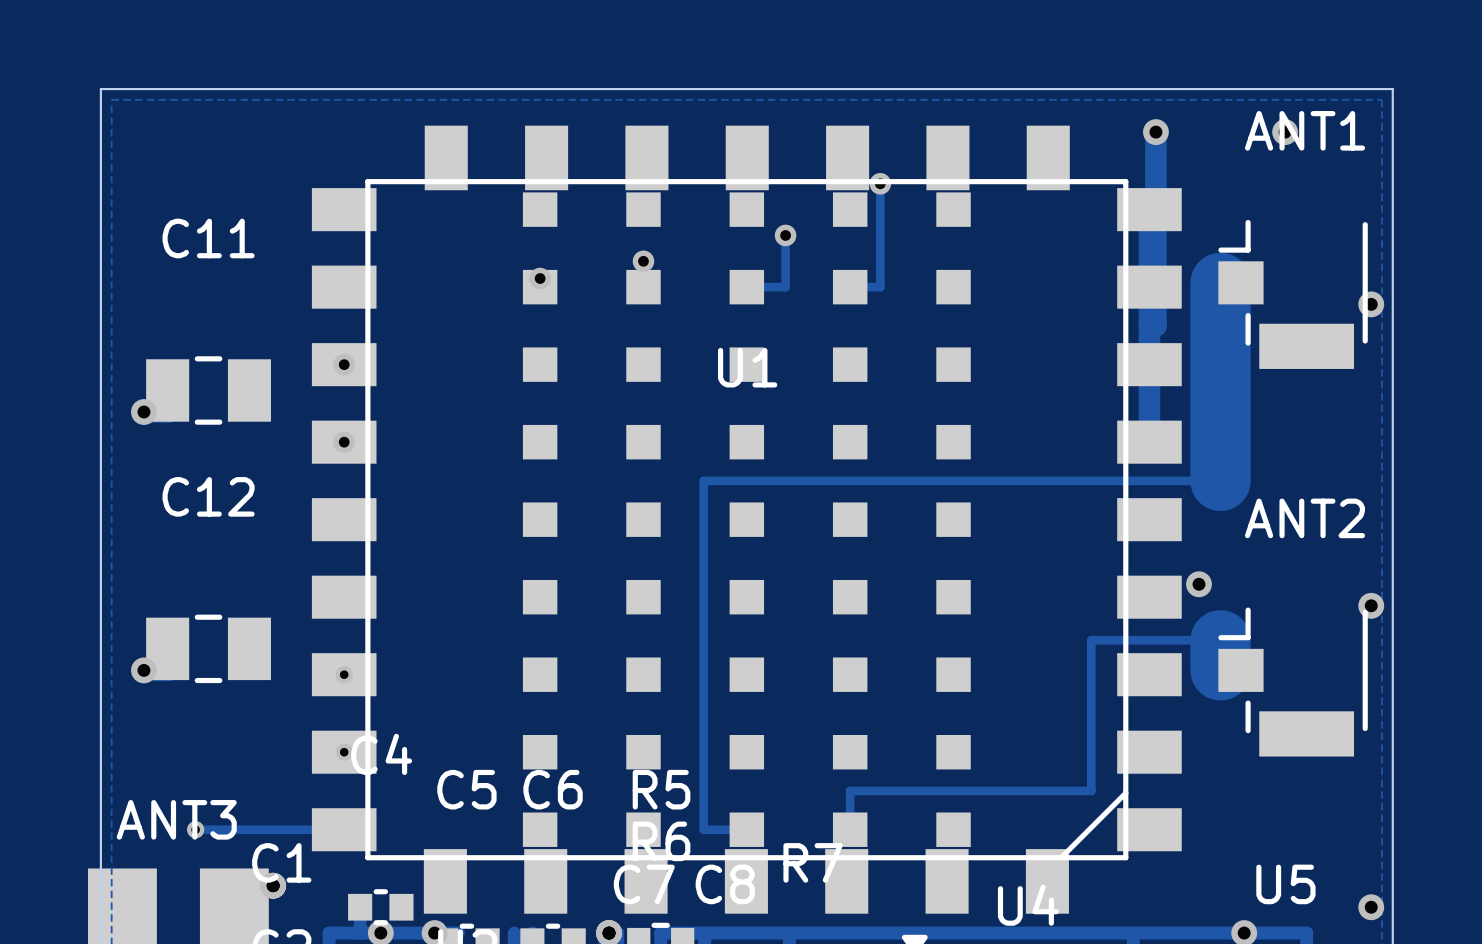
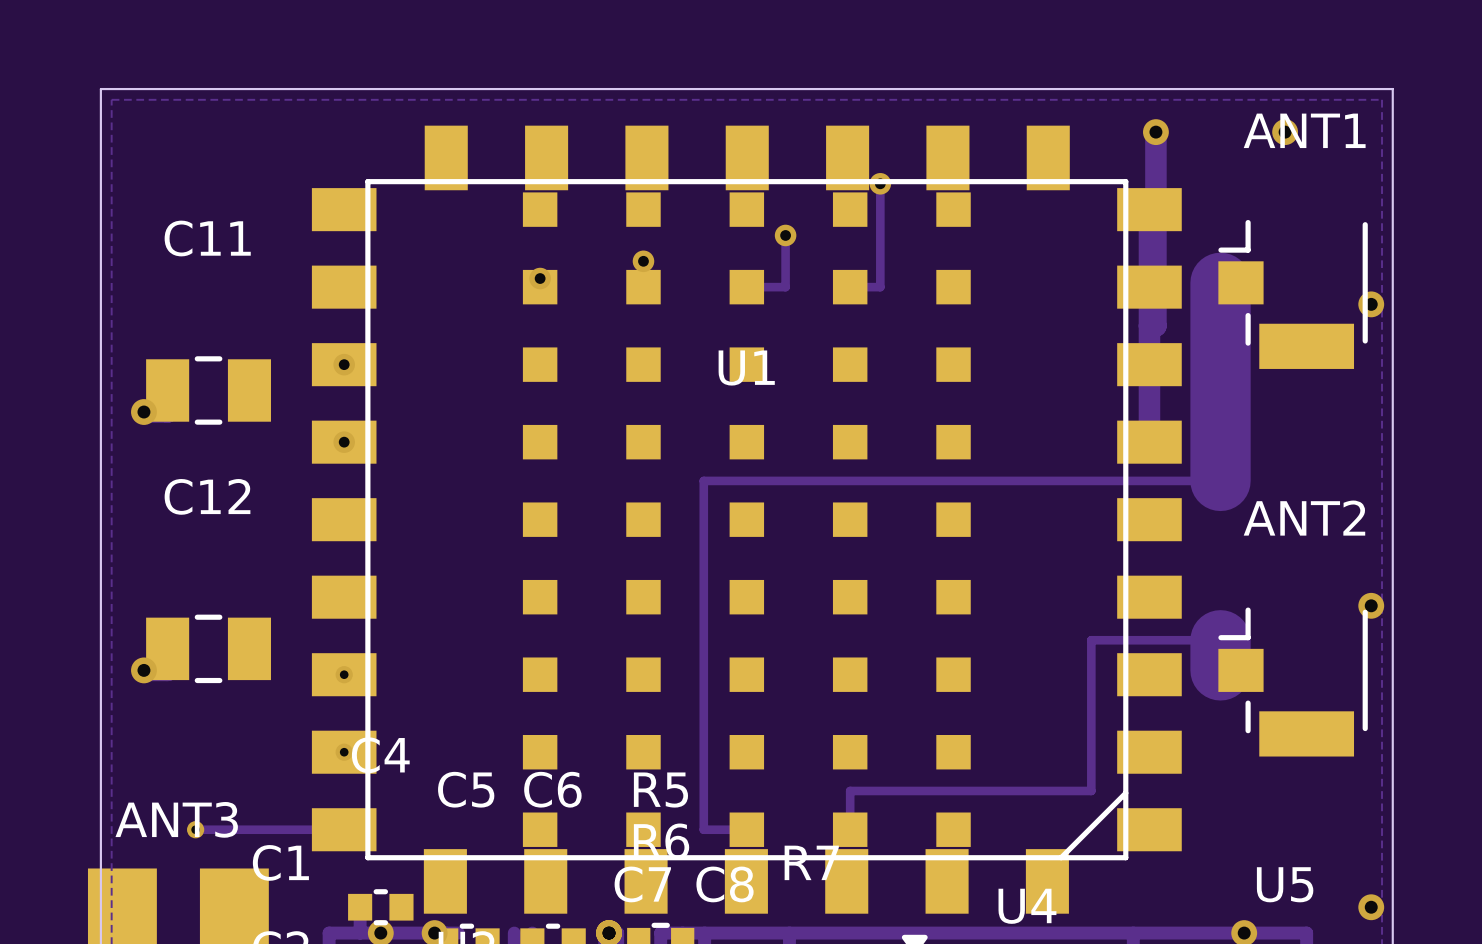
via: (1198, 584) -> none
via: (273, 885) -> none

